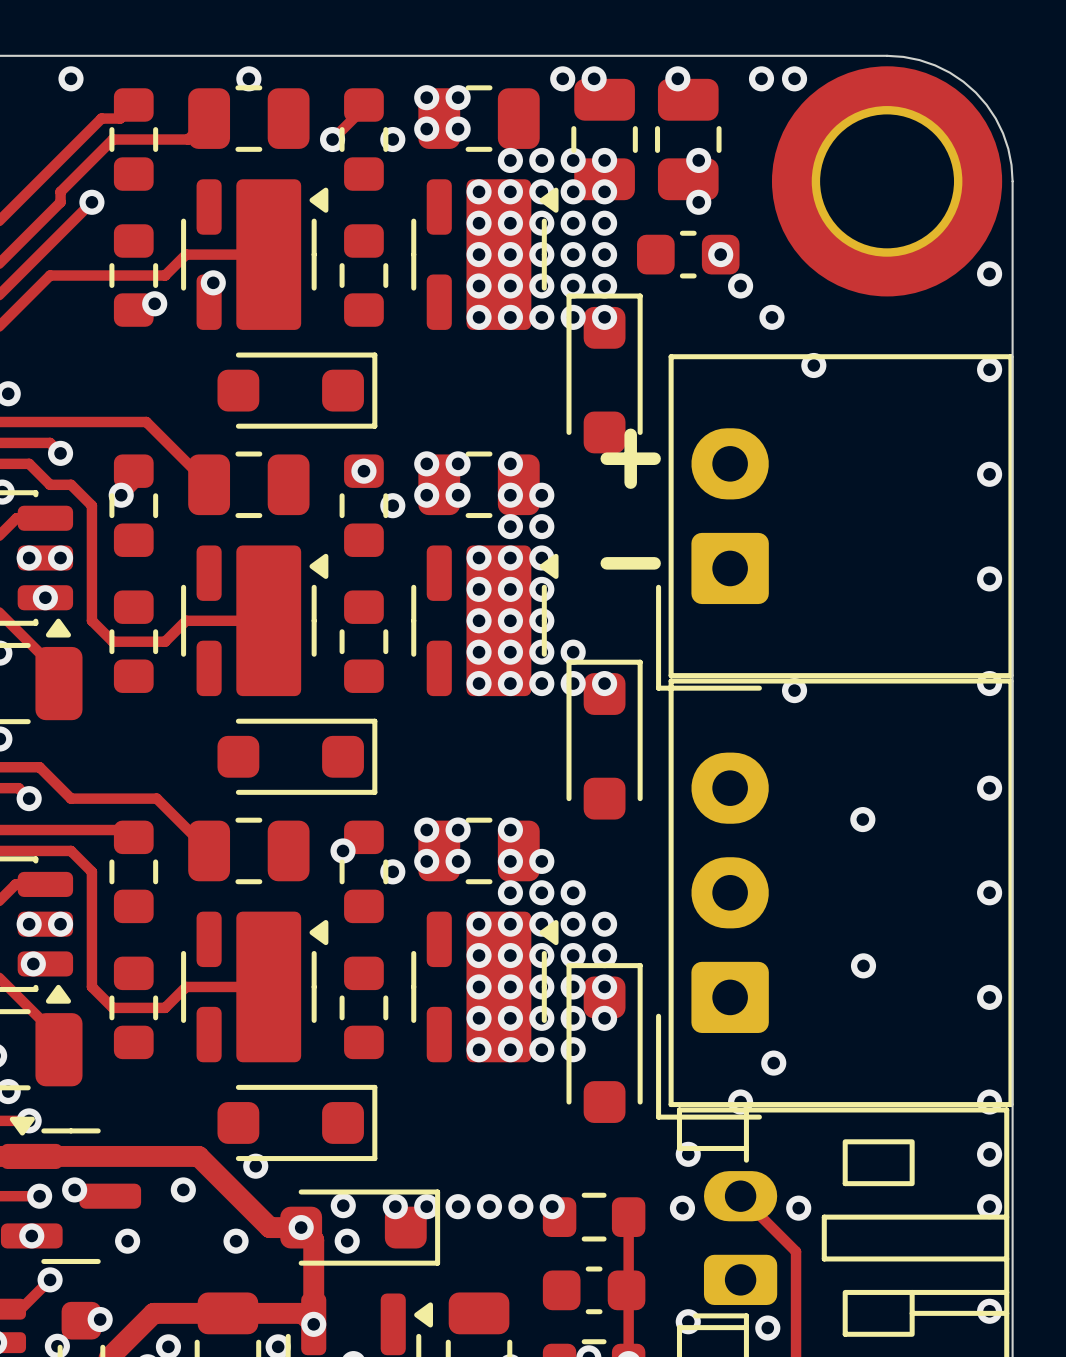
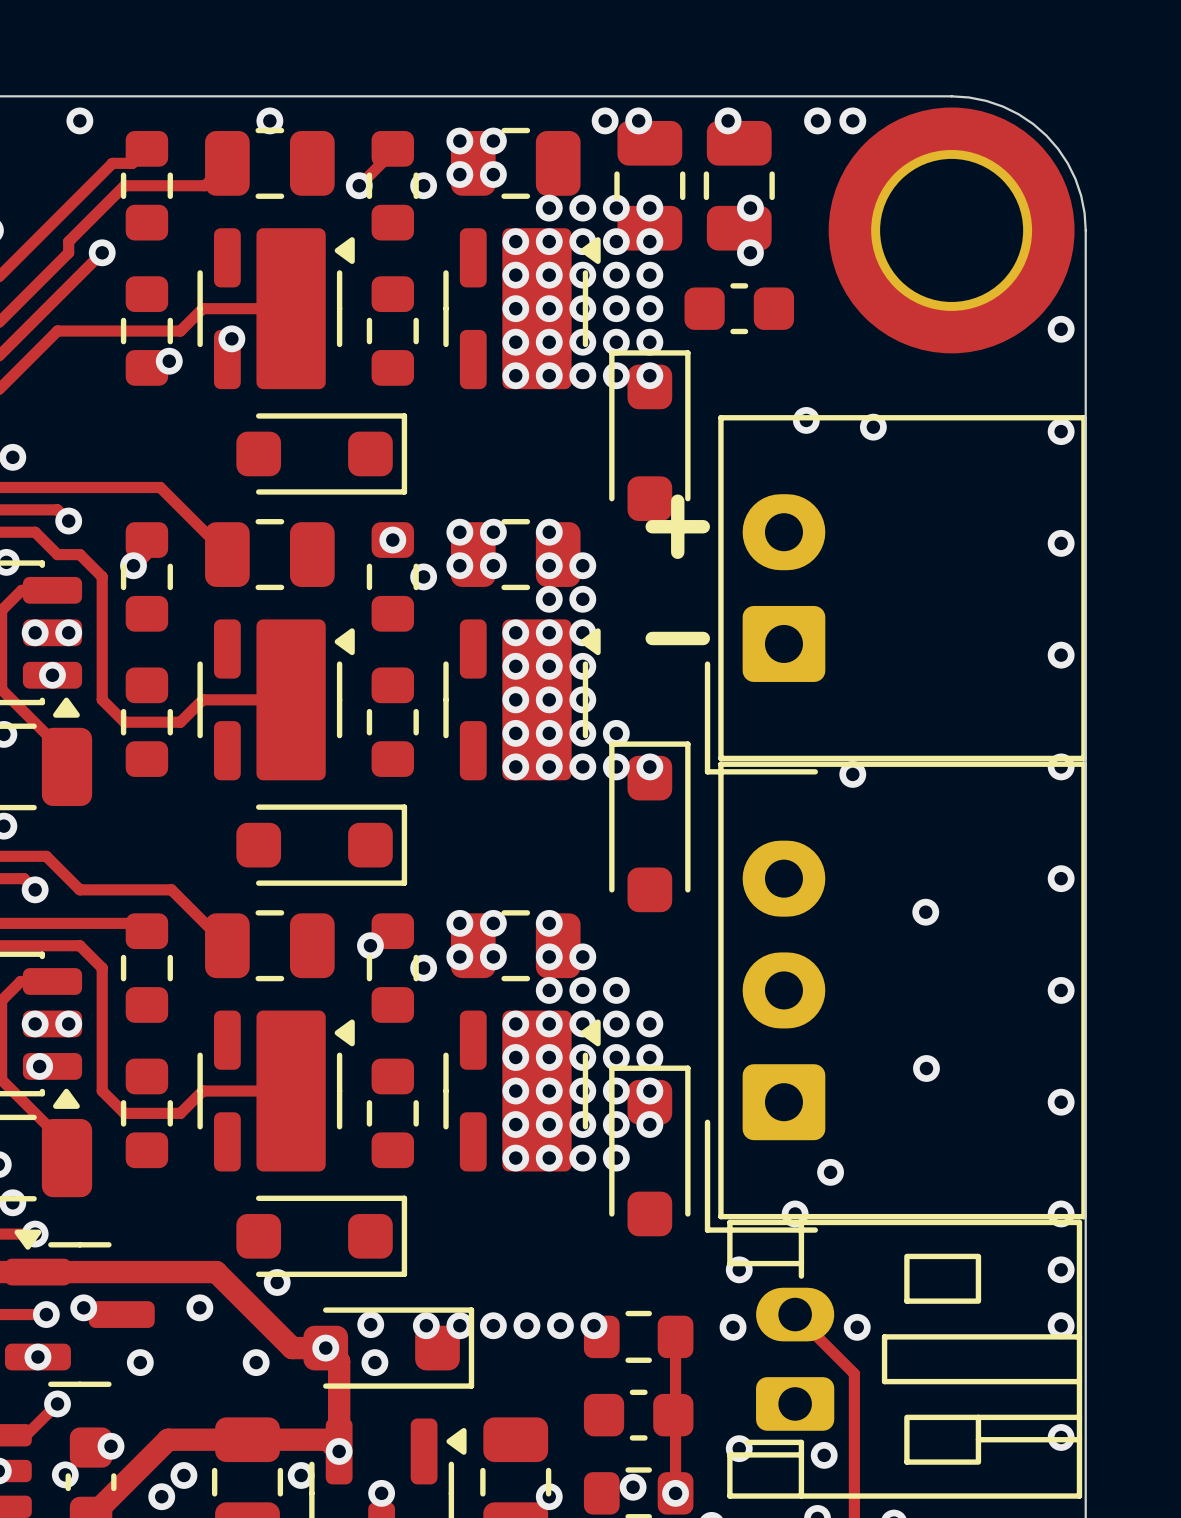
via: (720, 254) -> none
via: (740, 285) -> none
via: (771, 317) -> none
via: none -> (806, 420)

